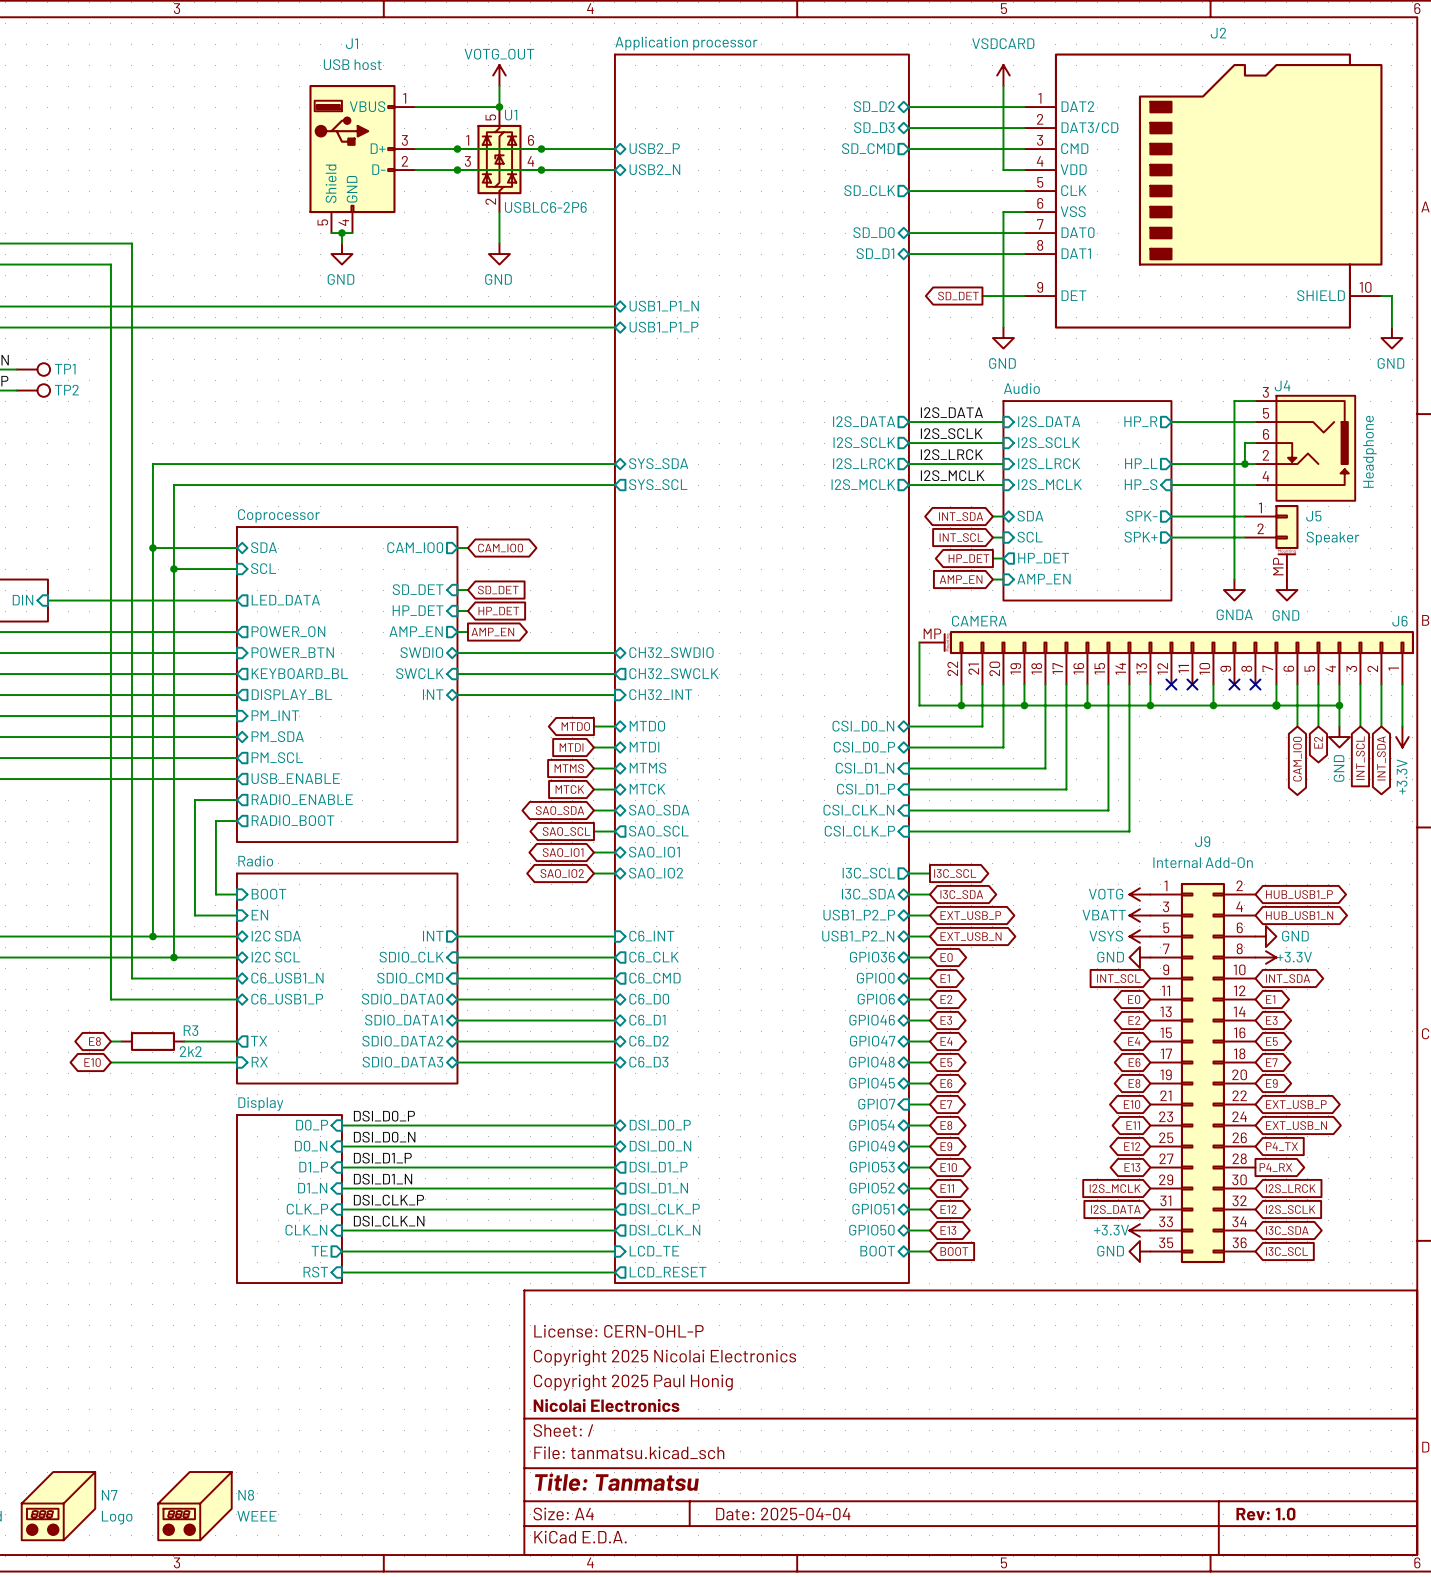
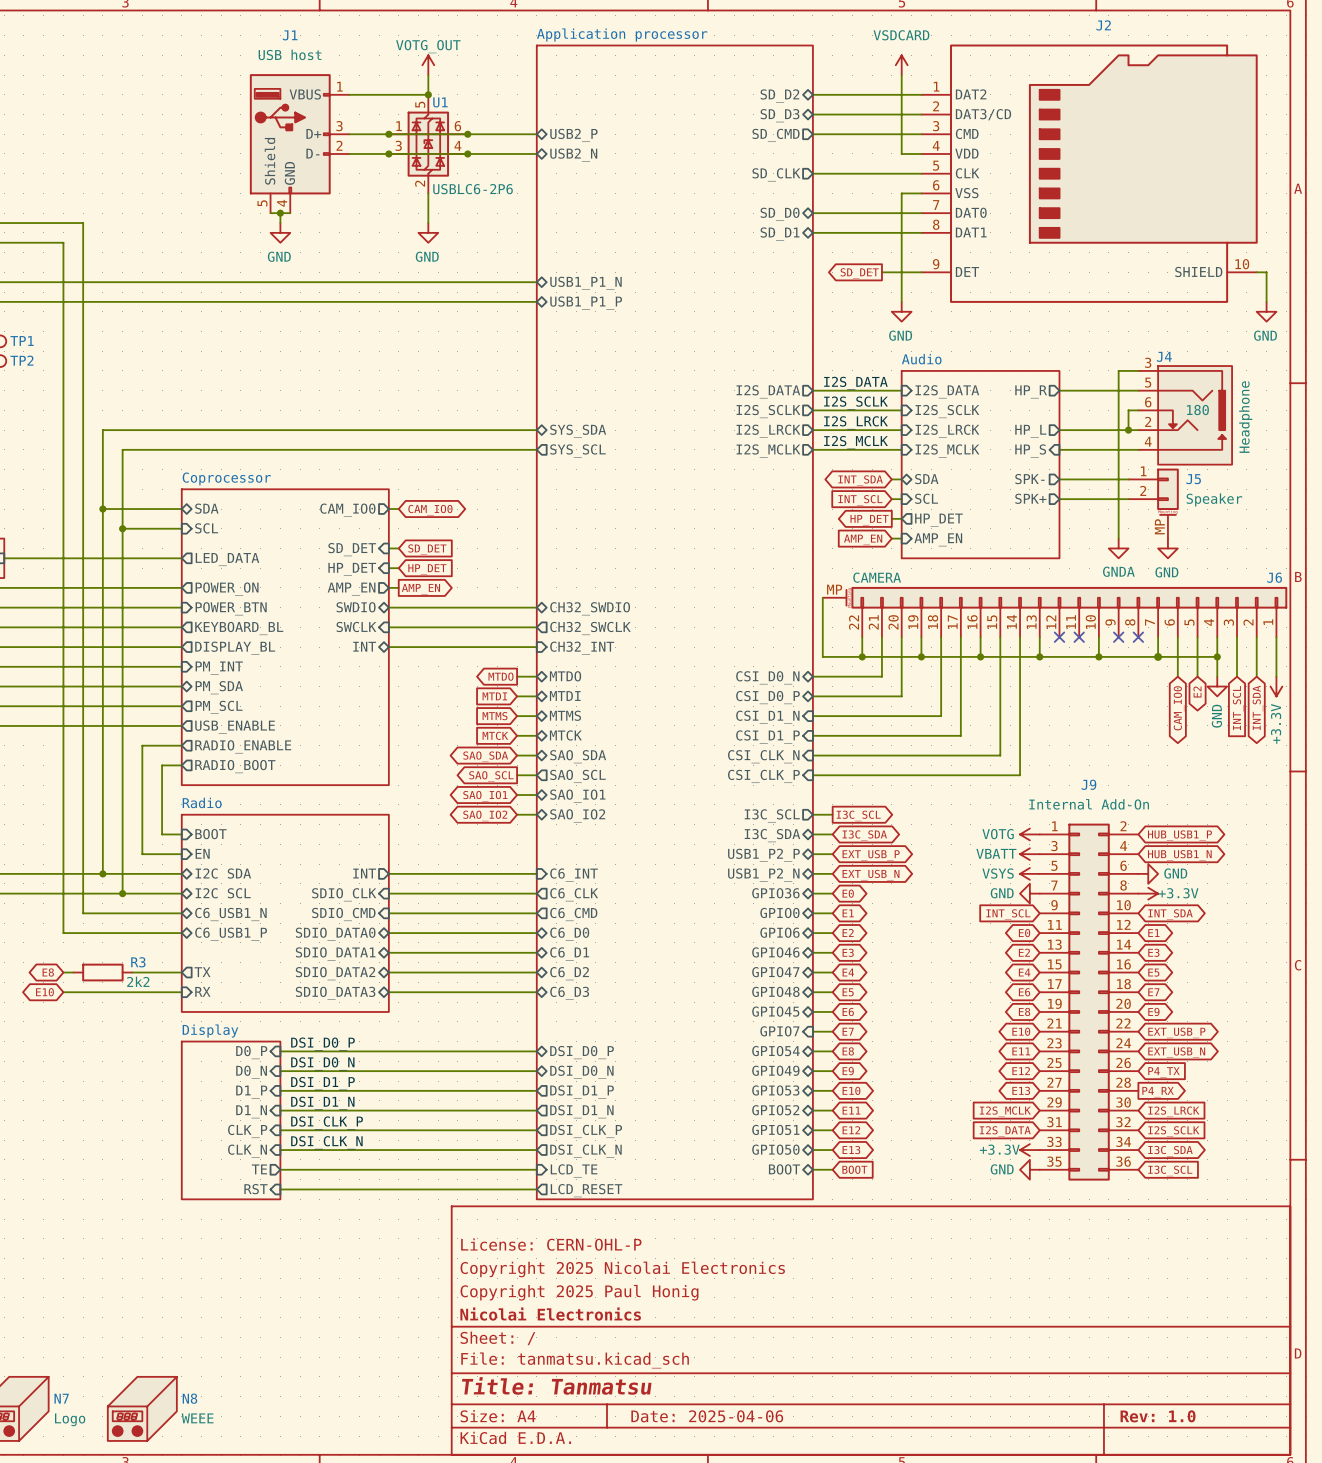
J4 text: none -> 180 (1197, 410)
title block: Date: 2025-04-04 (783, 1514) -> Date: 2025-04-06 (707, 1416)

